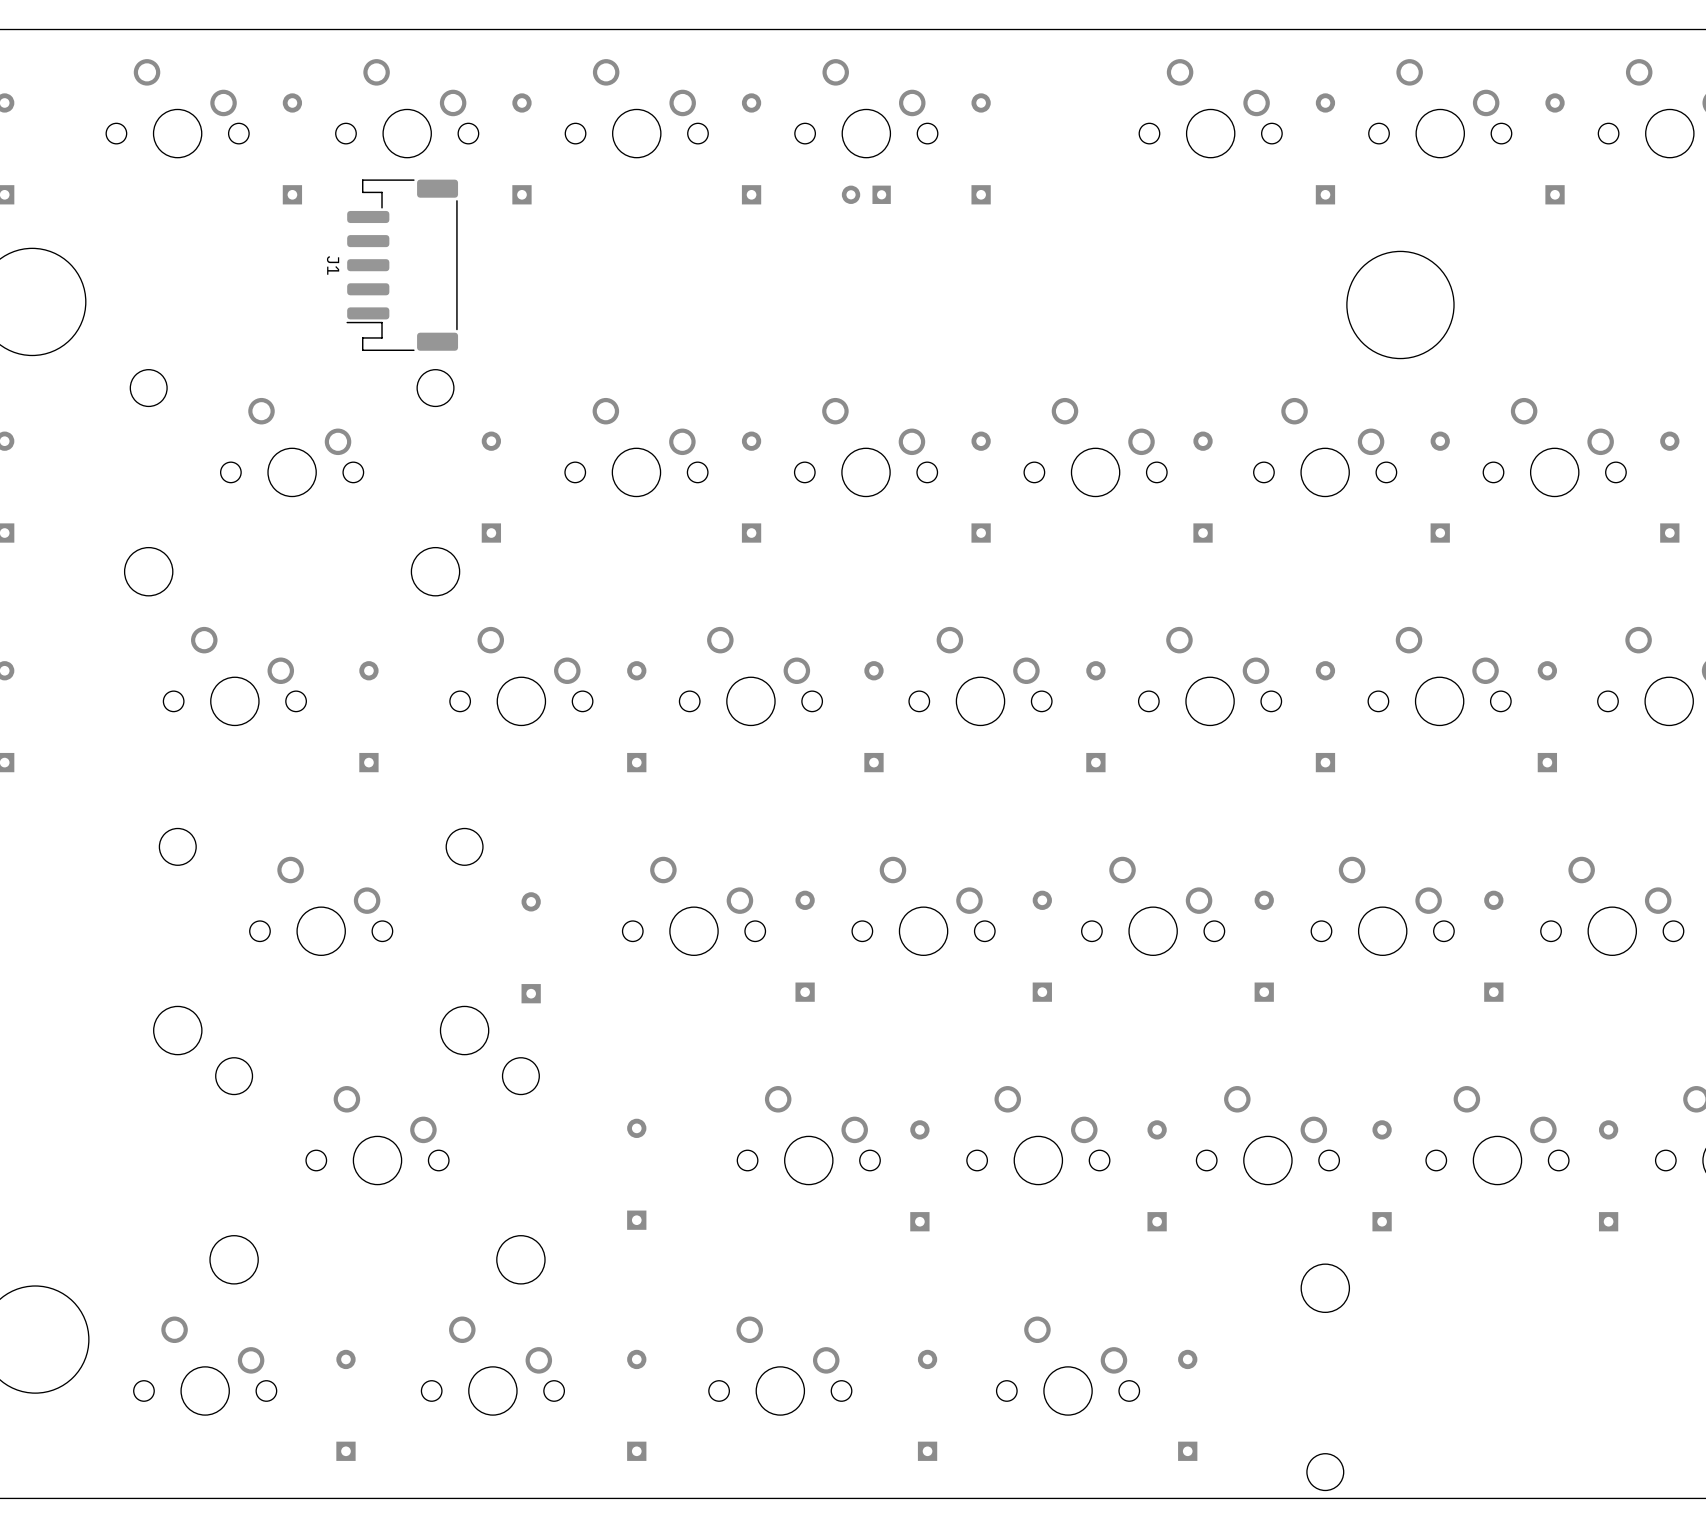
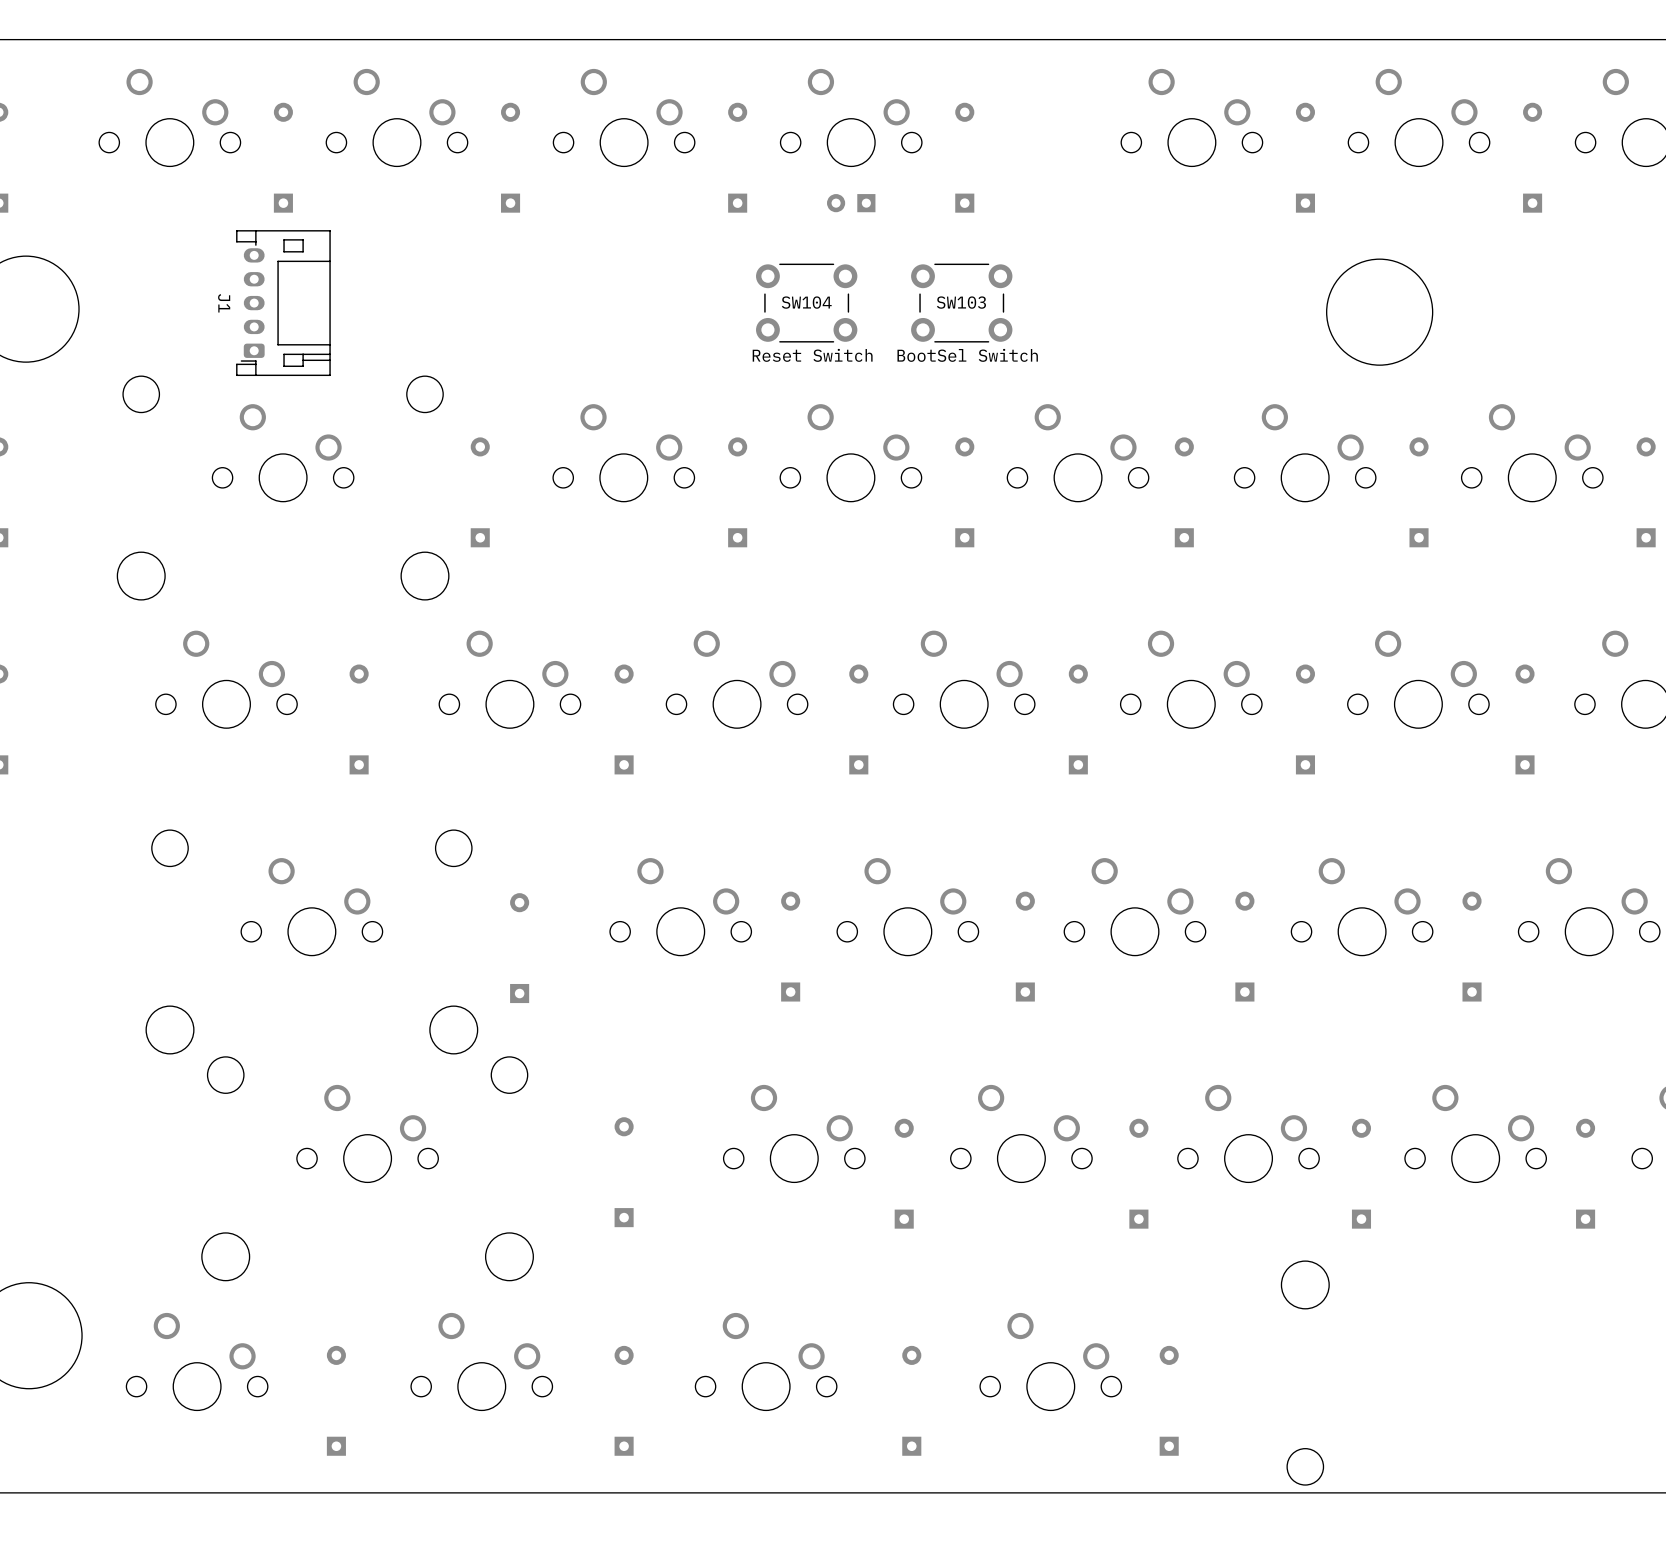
J1 footprint: [346, 179, 459, 351] -> [236, 230, 331, 377]
SW104: none -> Reset Switch (806, 303)
SW103: none -> BootSel Switch (961, 303)

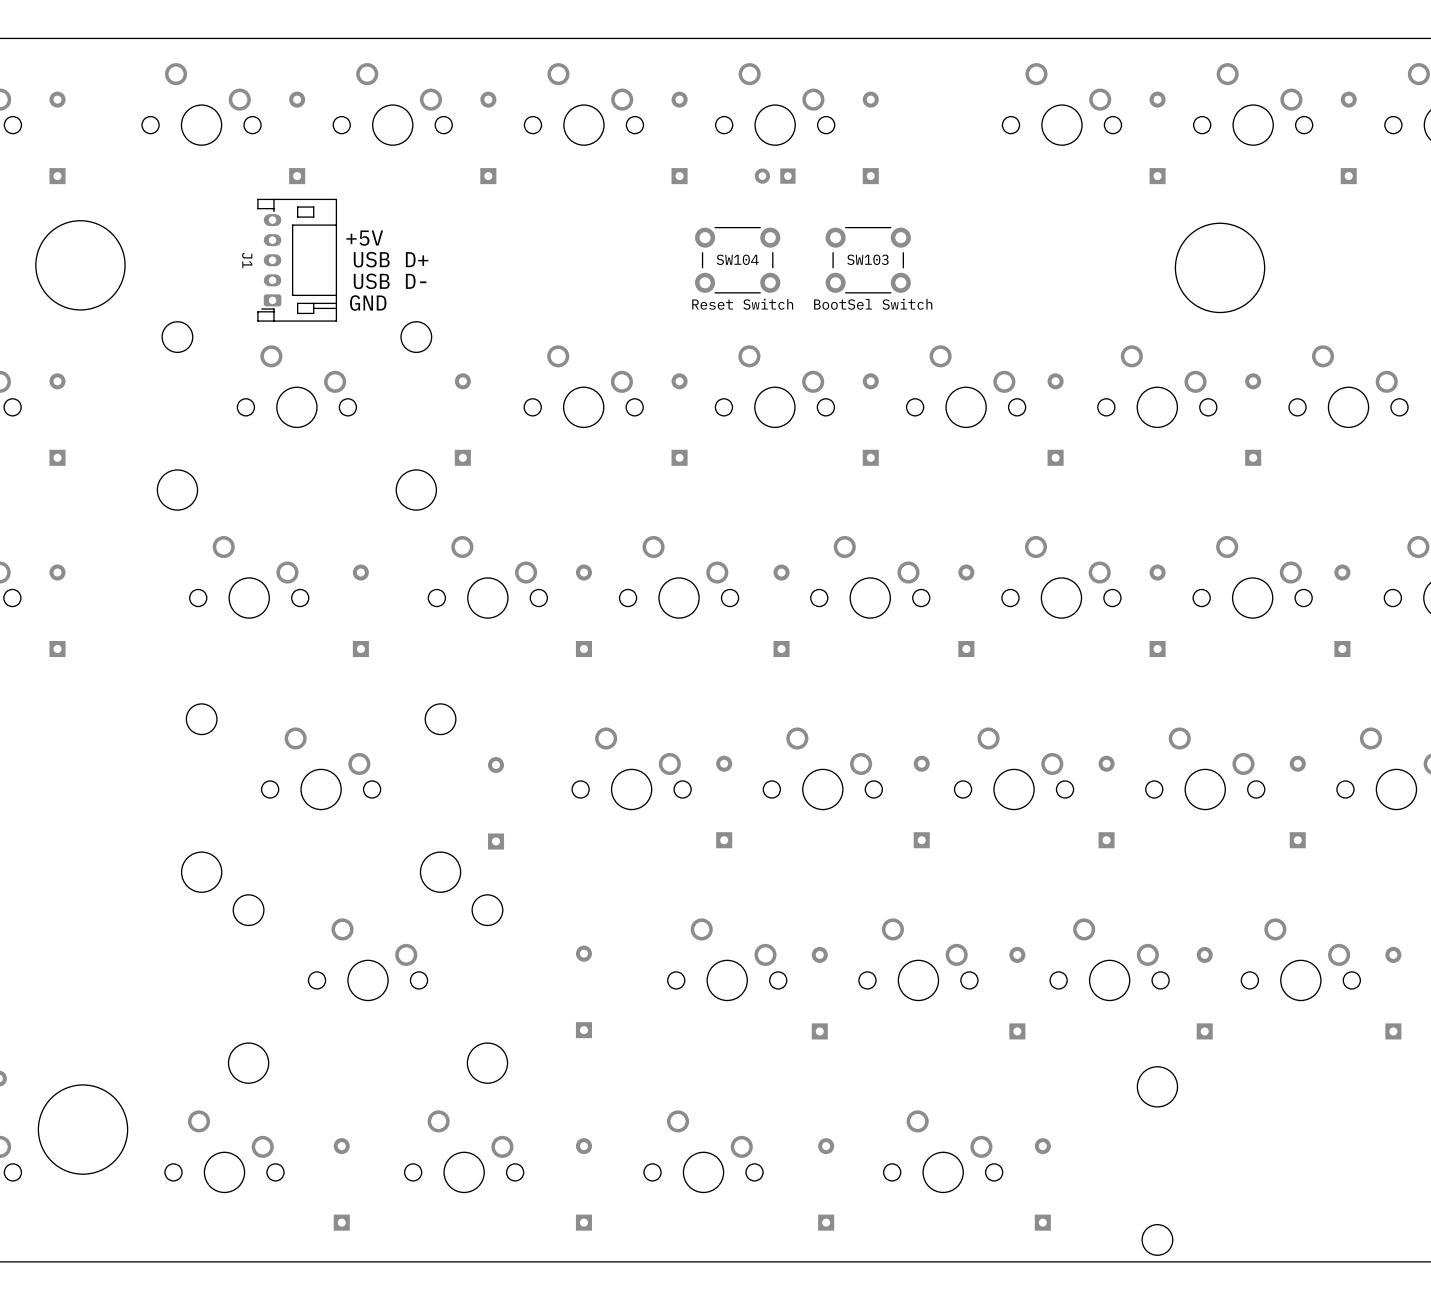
text: none -> +5V (364, 238)
text: none -> USB D+ (391, 259)
text: none -> USB D- (390, 281)
text: none -> GND (368, 303)

